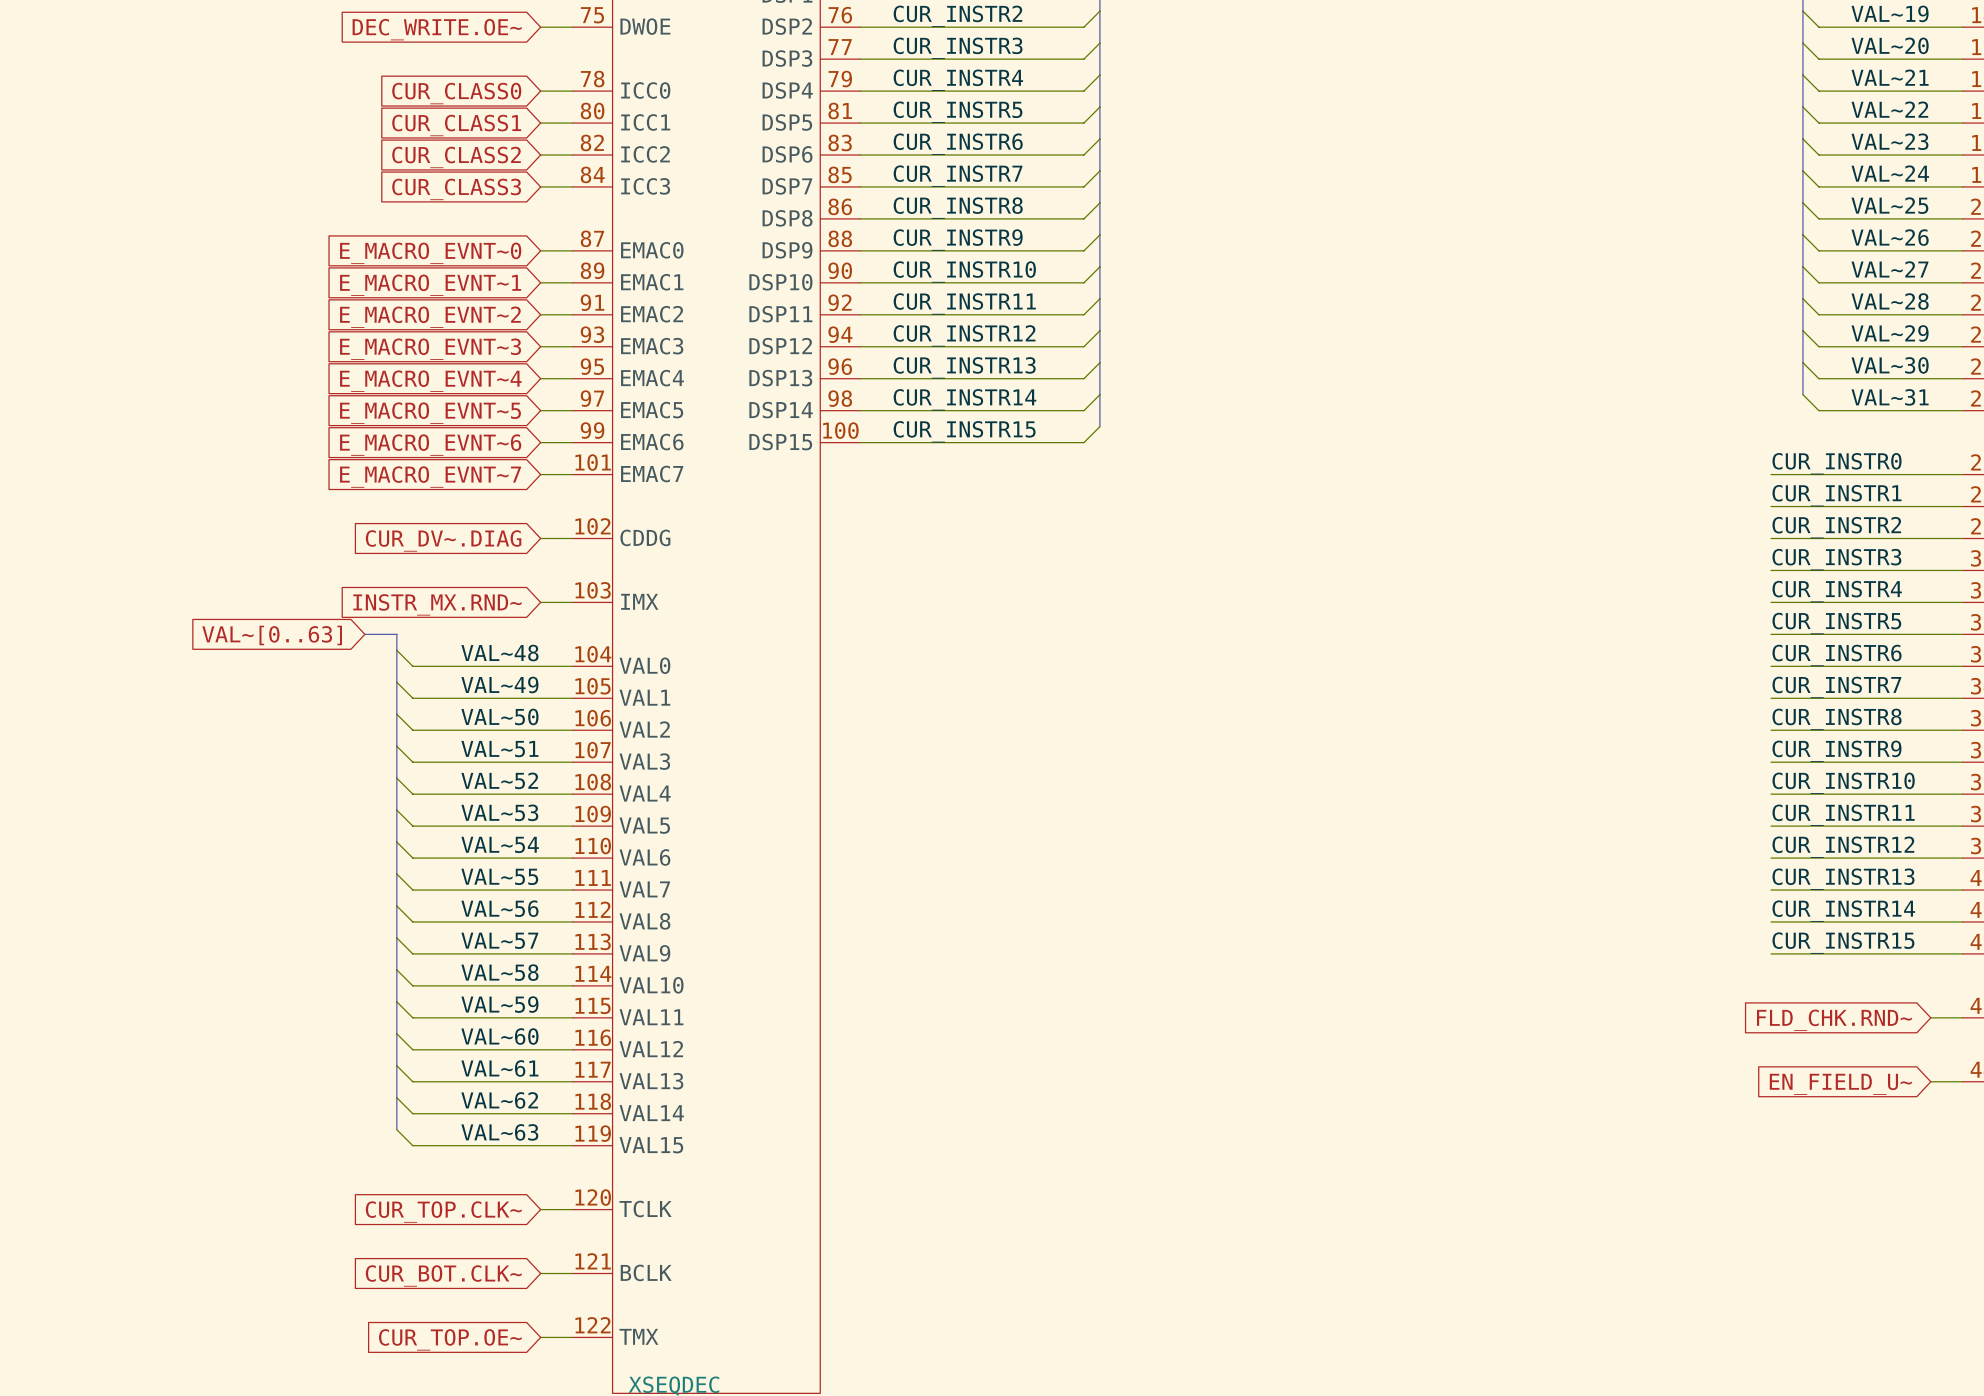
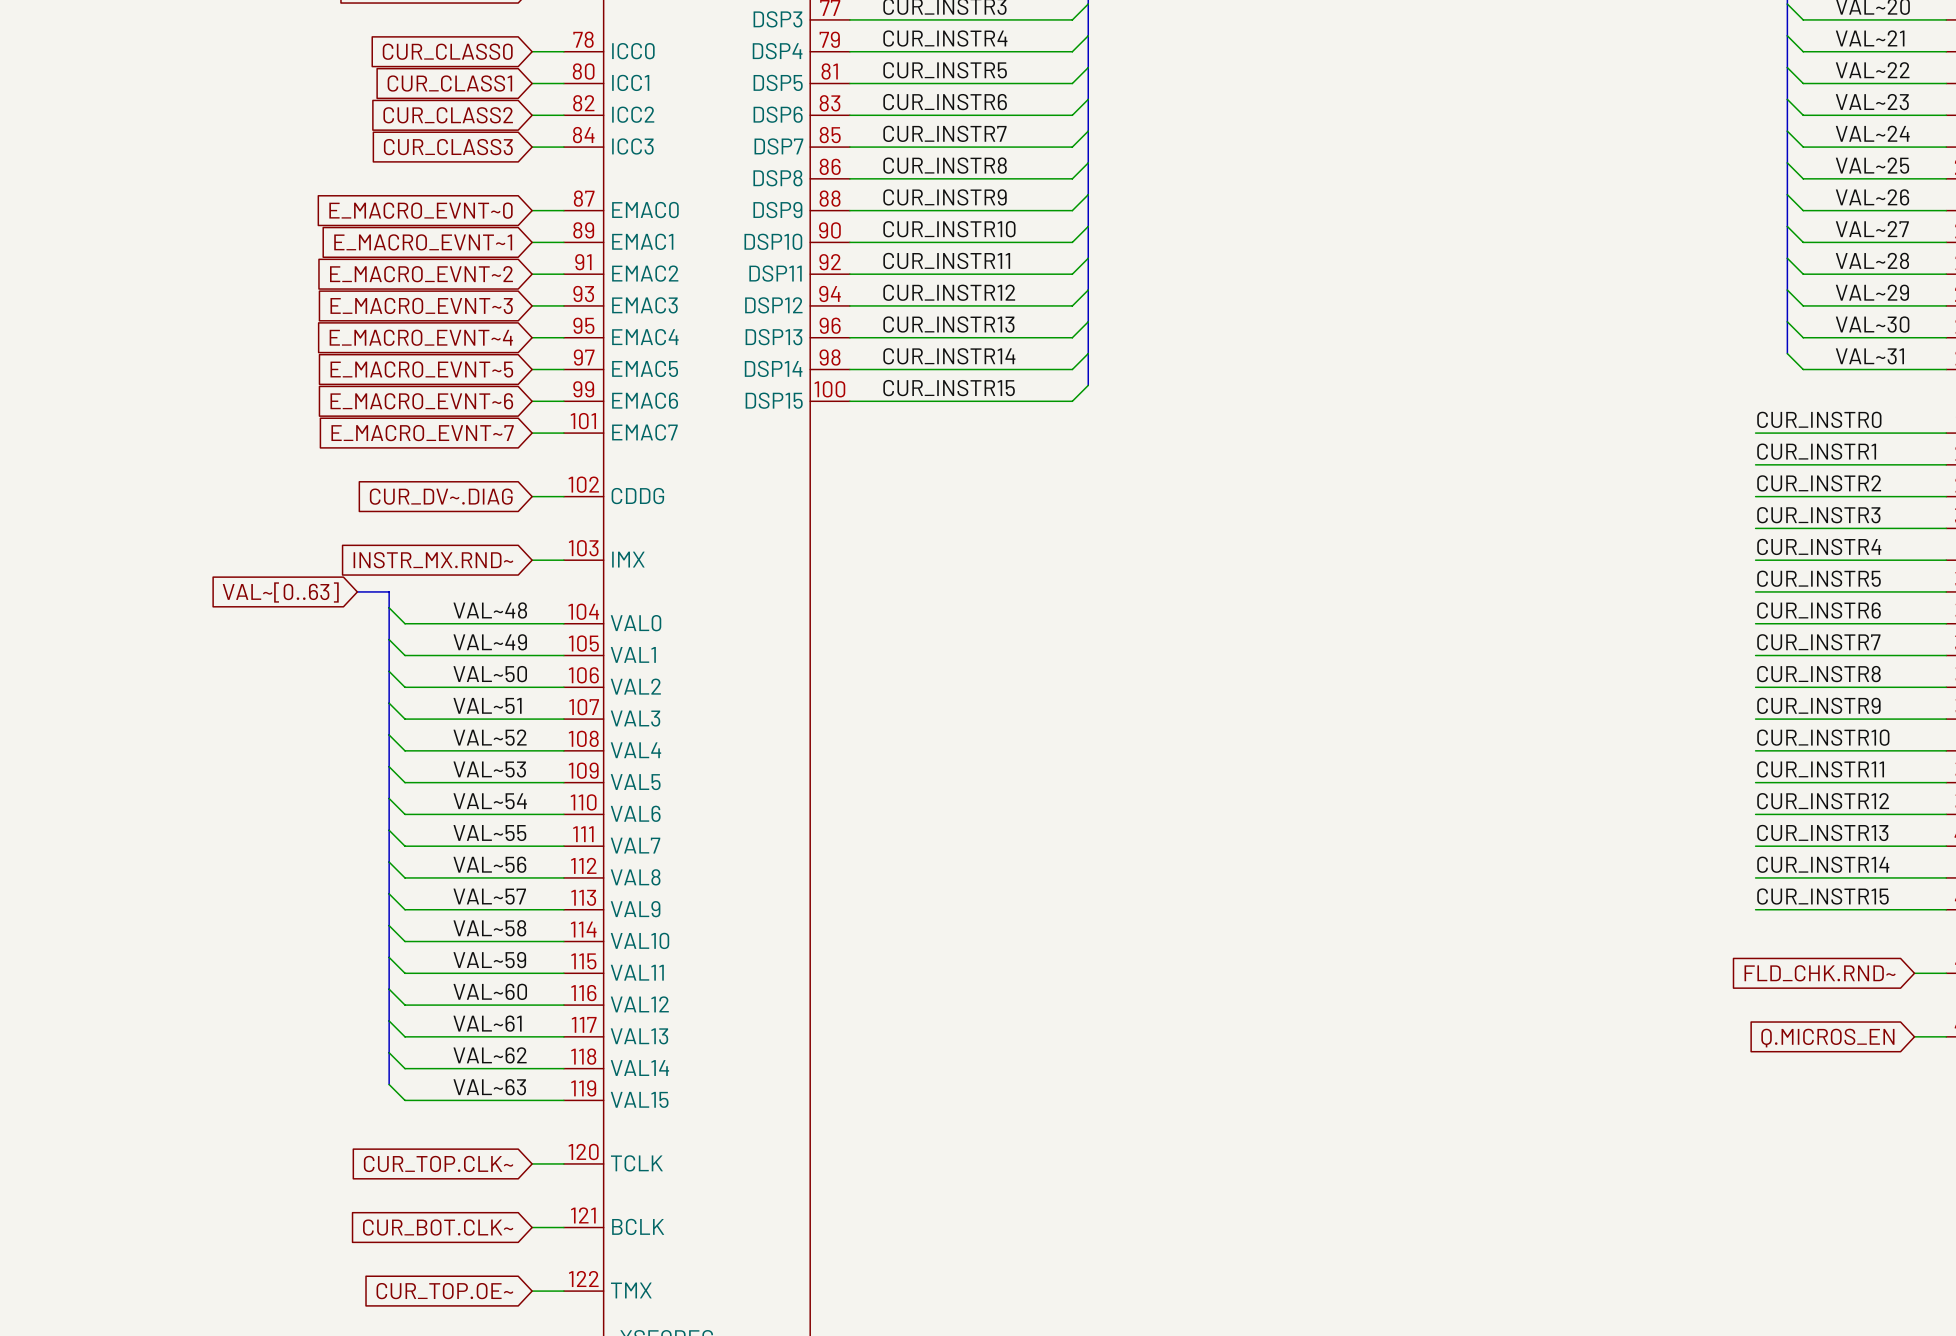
global label: EN_FIELD_U~ (1840, 1084) -> Q.MICROS_EN (1827, 1038)

